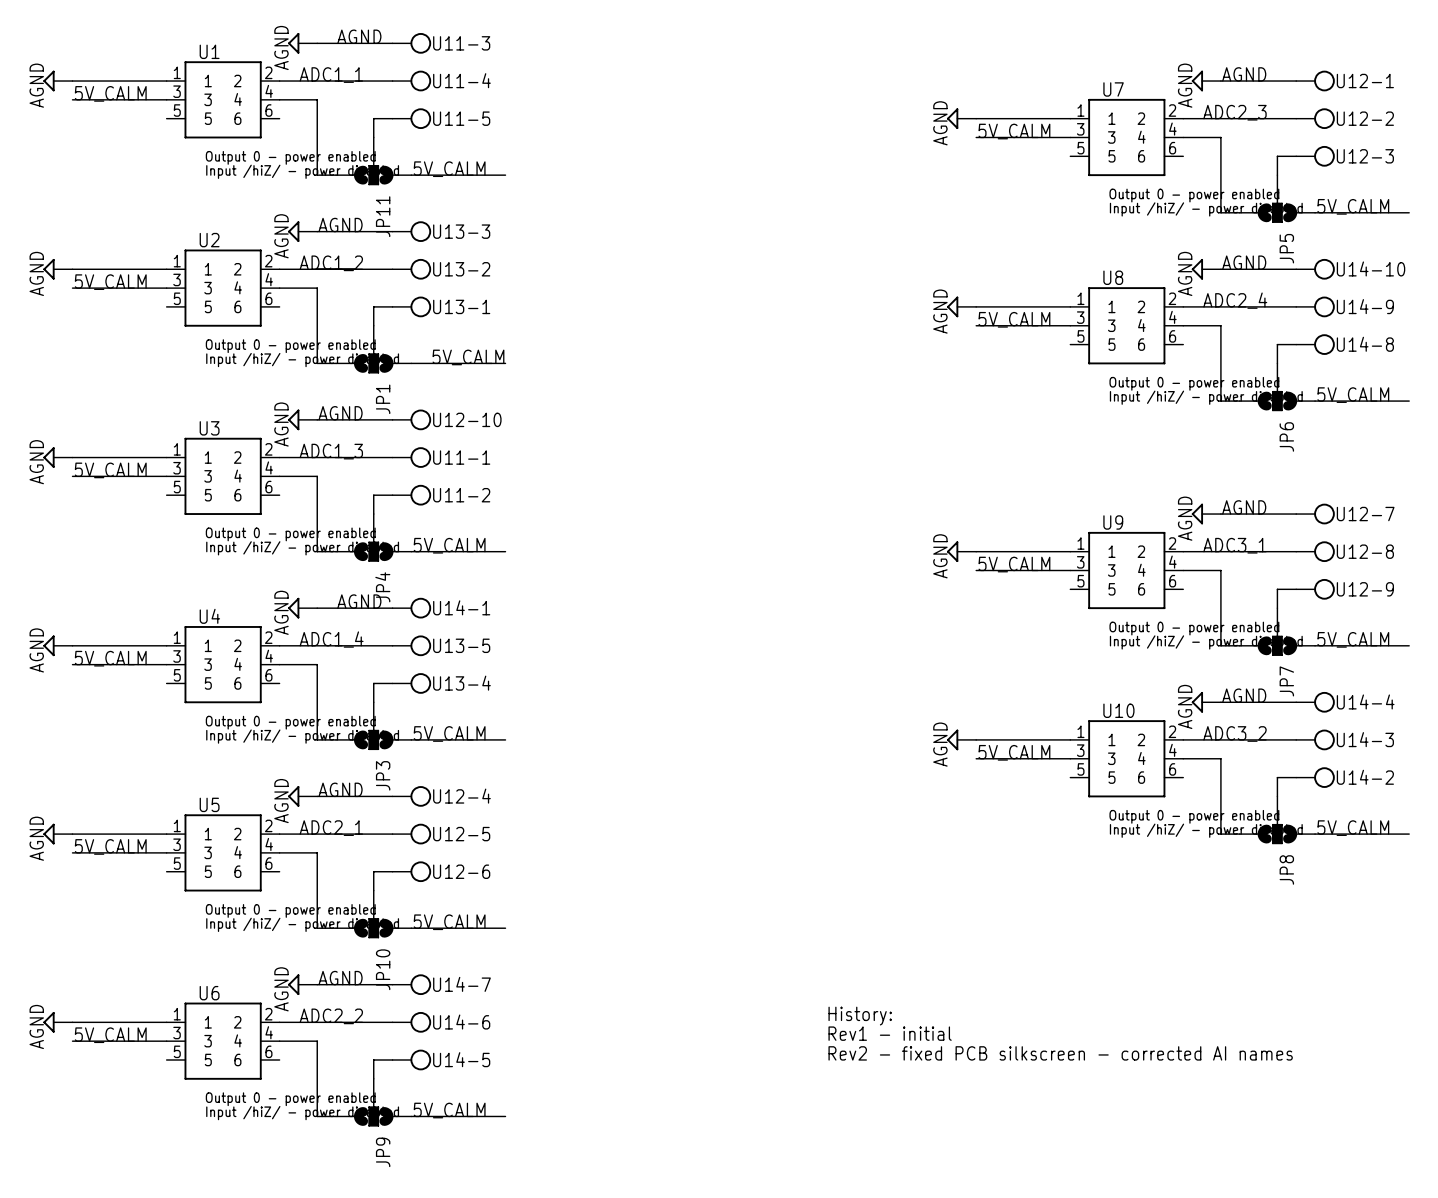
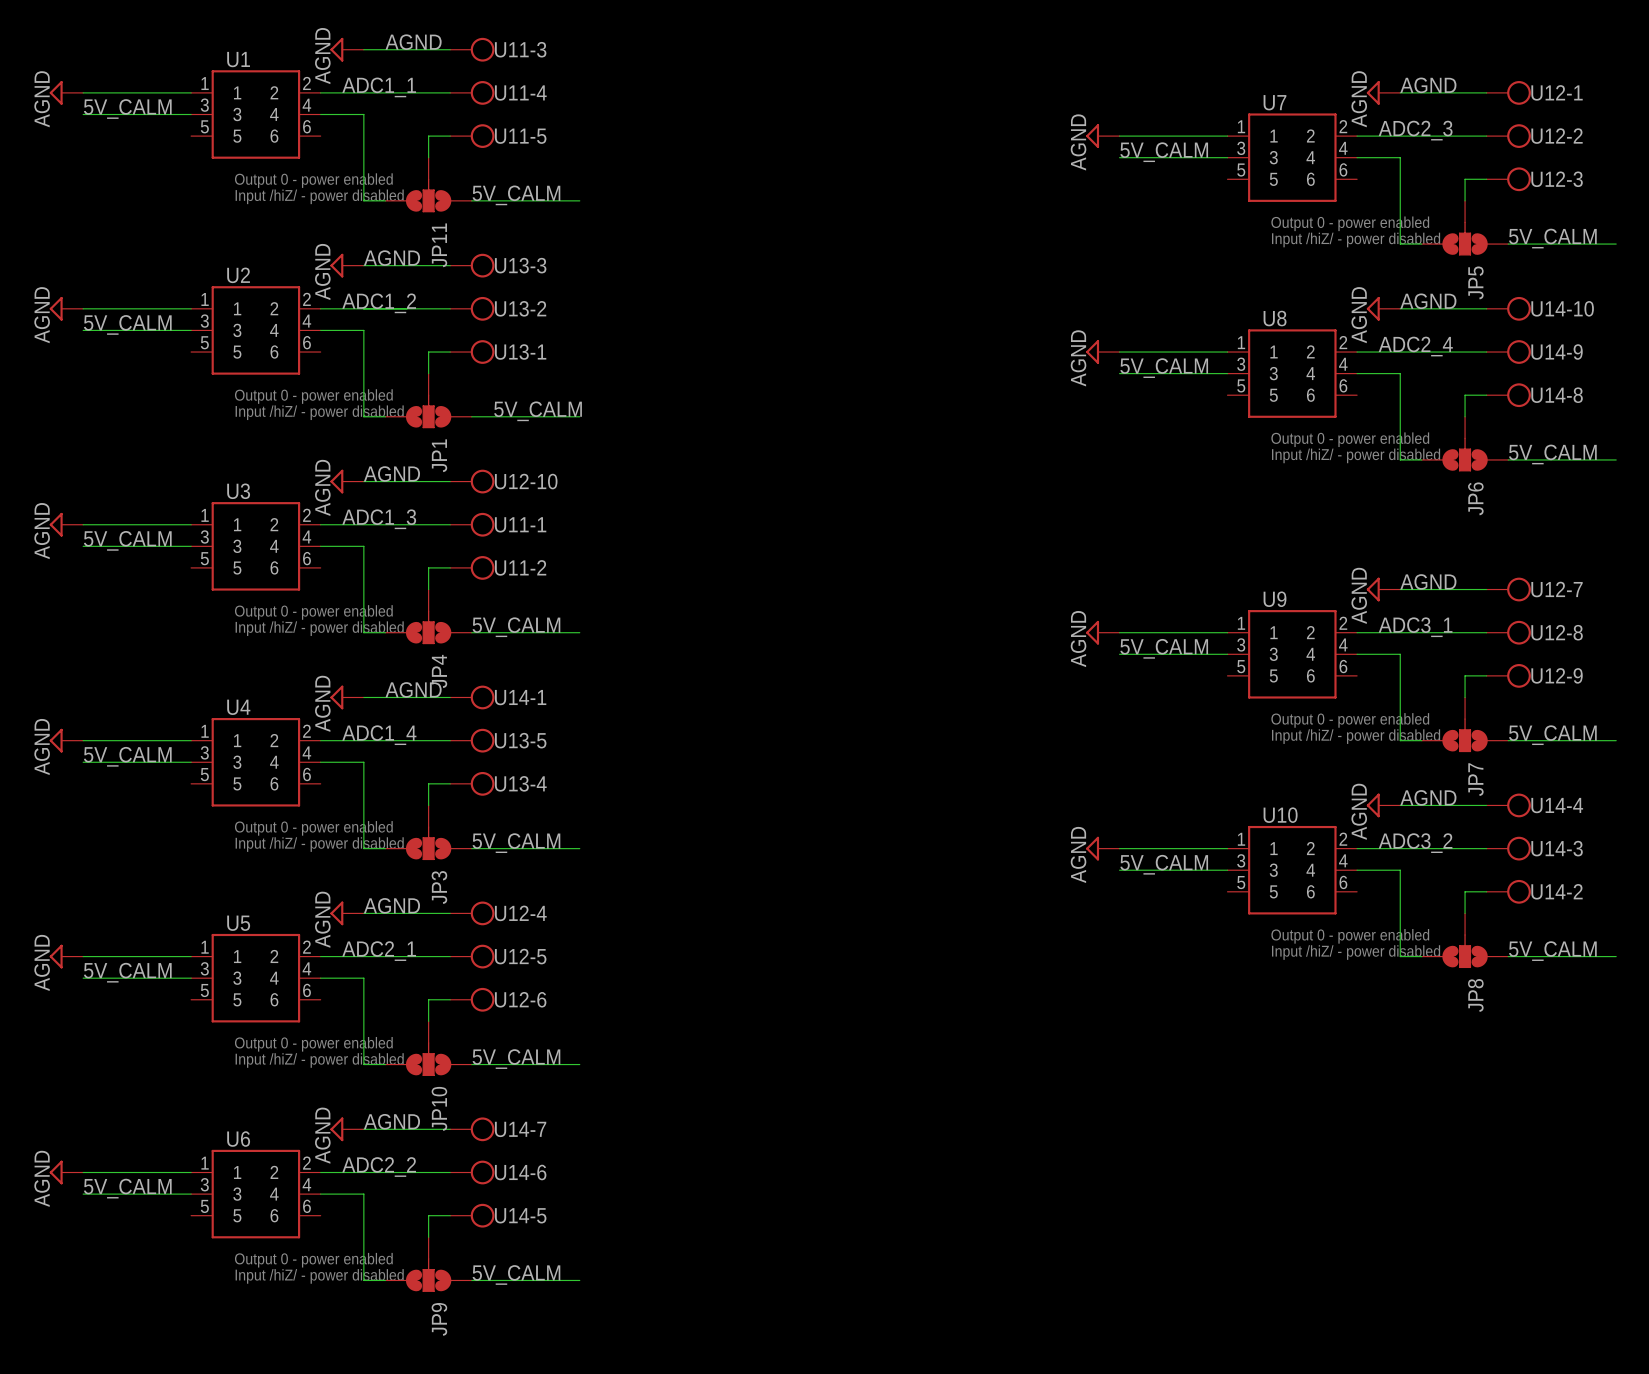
text: History: (860, 1016) -> none
text: Rev1 - initial (890, 1033) -> none
text: Rev2 - fixed PCB silkscreen - corrected AI names (1060, 1053) -> none

